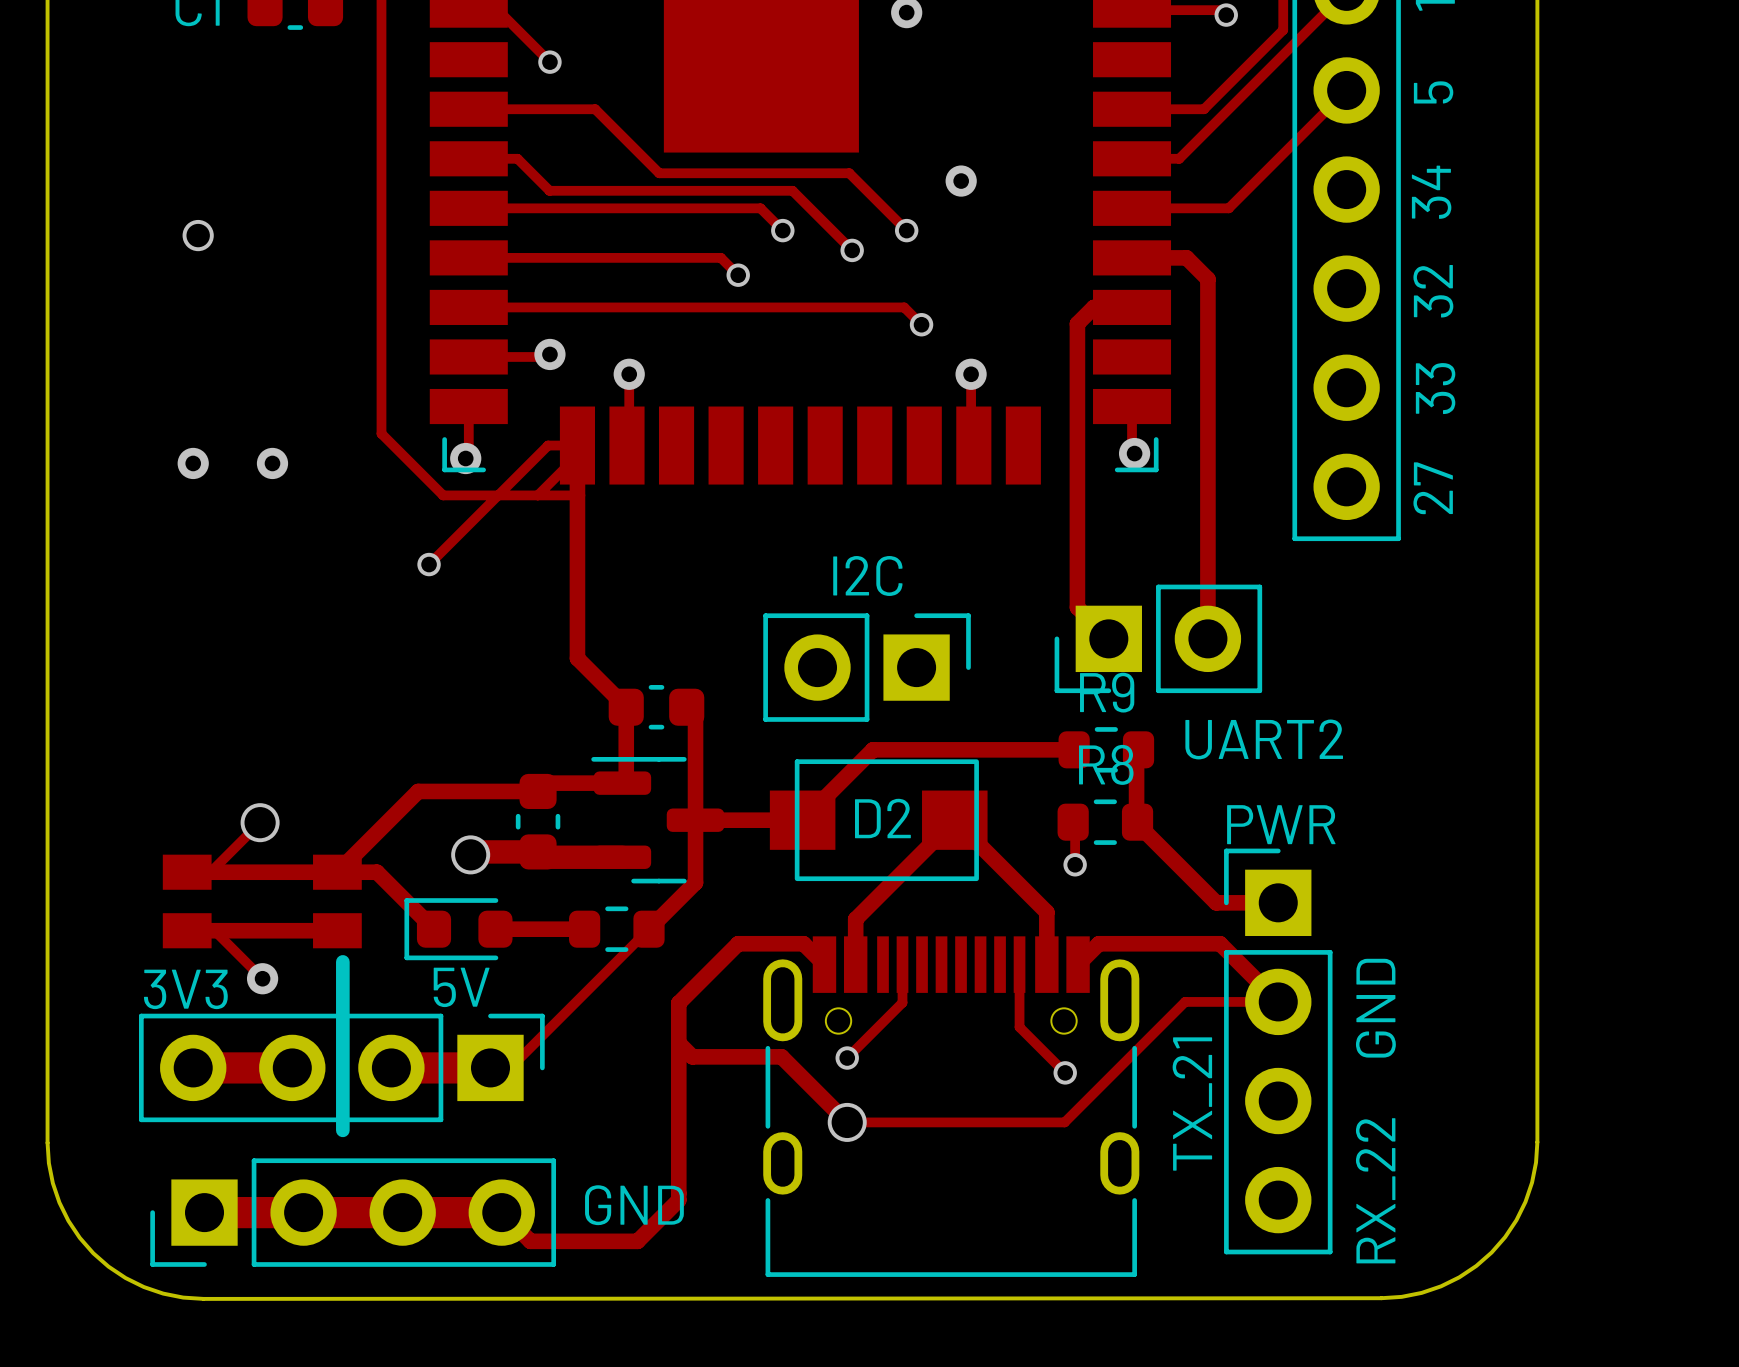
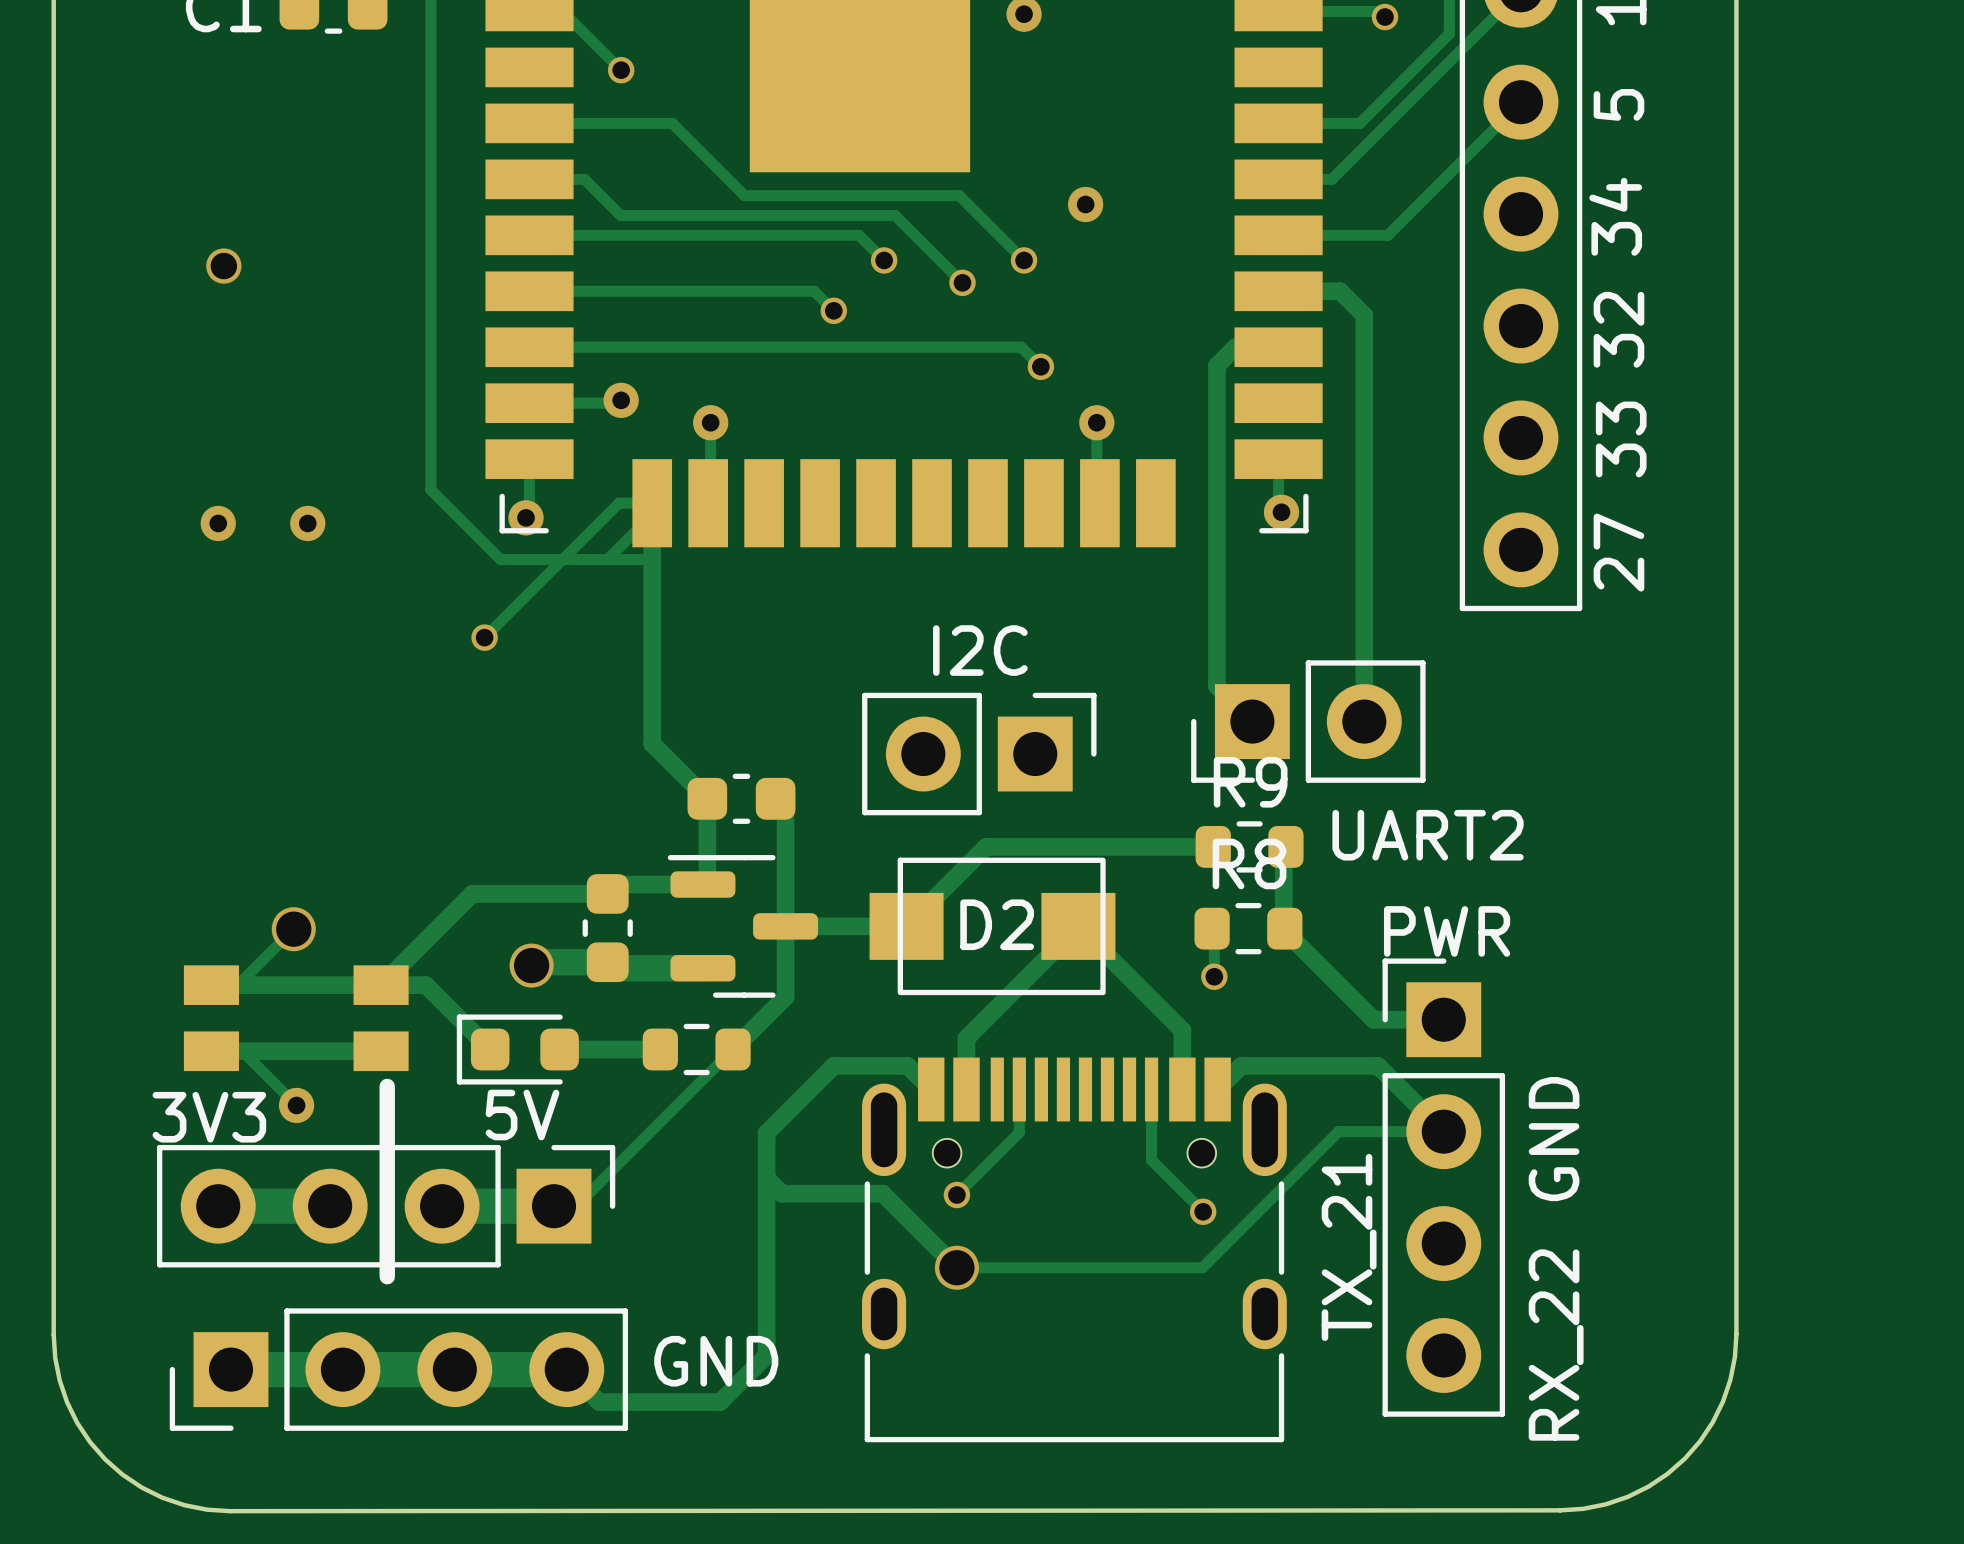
board edge: (1537, 1142) (1536, 1162) (1525, 1201) (1505, 1237) (1491, 1252) (1459, 1277) (1441, 1286) (1401, 1296) (203, 1298) (163, 1293) (143, 1287) (125, 1278) (93, 1253) (68, 1220) (59, 1202) (48, 1163) (47, 1142) -> (1736, 1290) (1734, 1357) (1730, 1379) (1723, 1401) (1712, 1422) (1700, 1441) (1684, 1458) (1667, 1473) (1648, 1486) (1627, 1496) (1605, 1504) (1583, 1508) (229, 1511) (206, 1509) (184, 1505) (162, 1497) (141, 1487) (122, 1474) (105, 1459) (90, 1442) (77, 1423) (67, 1402) (59, 1380) (55, 1357) (53, 1290)

